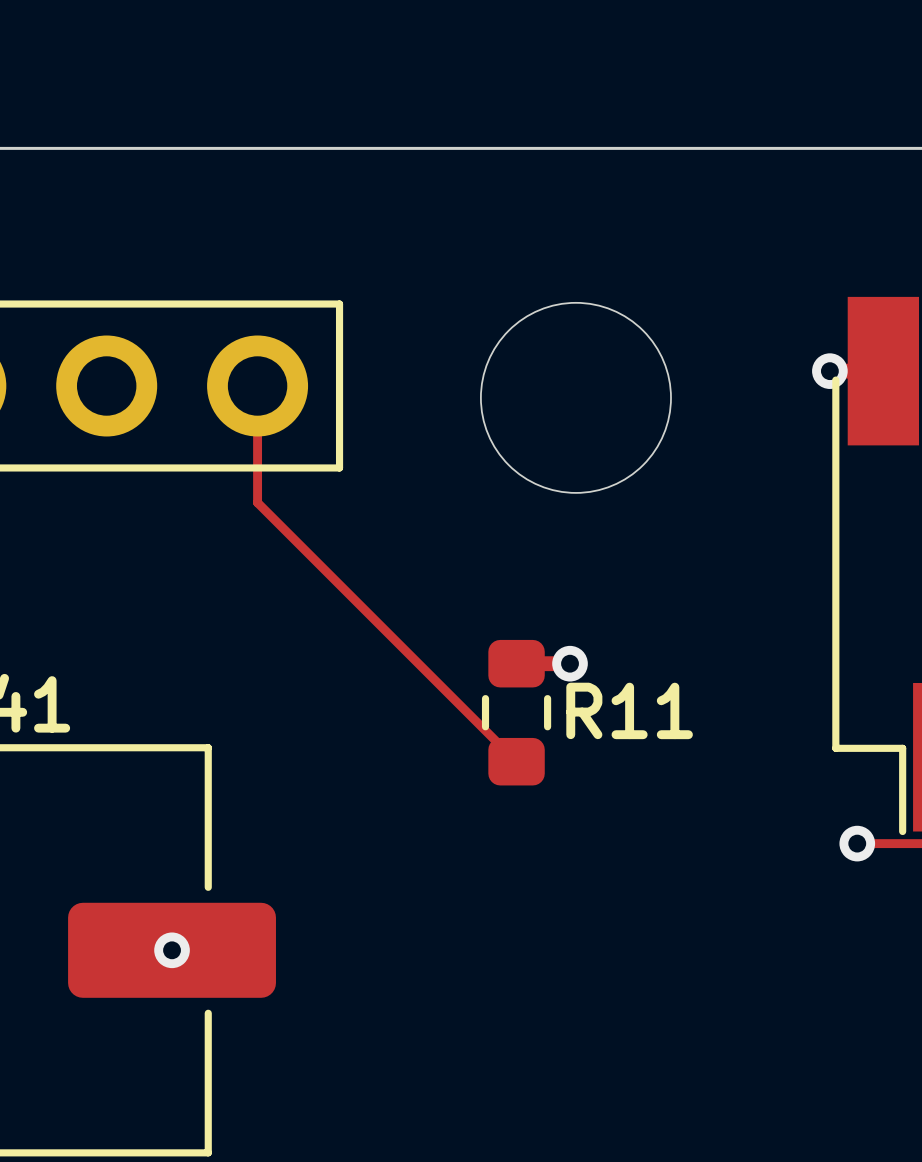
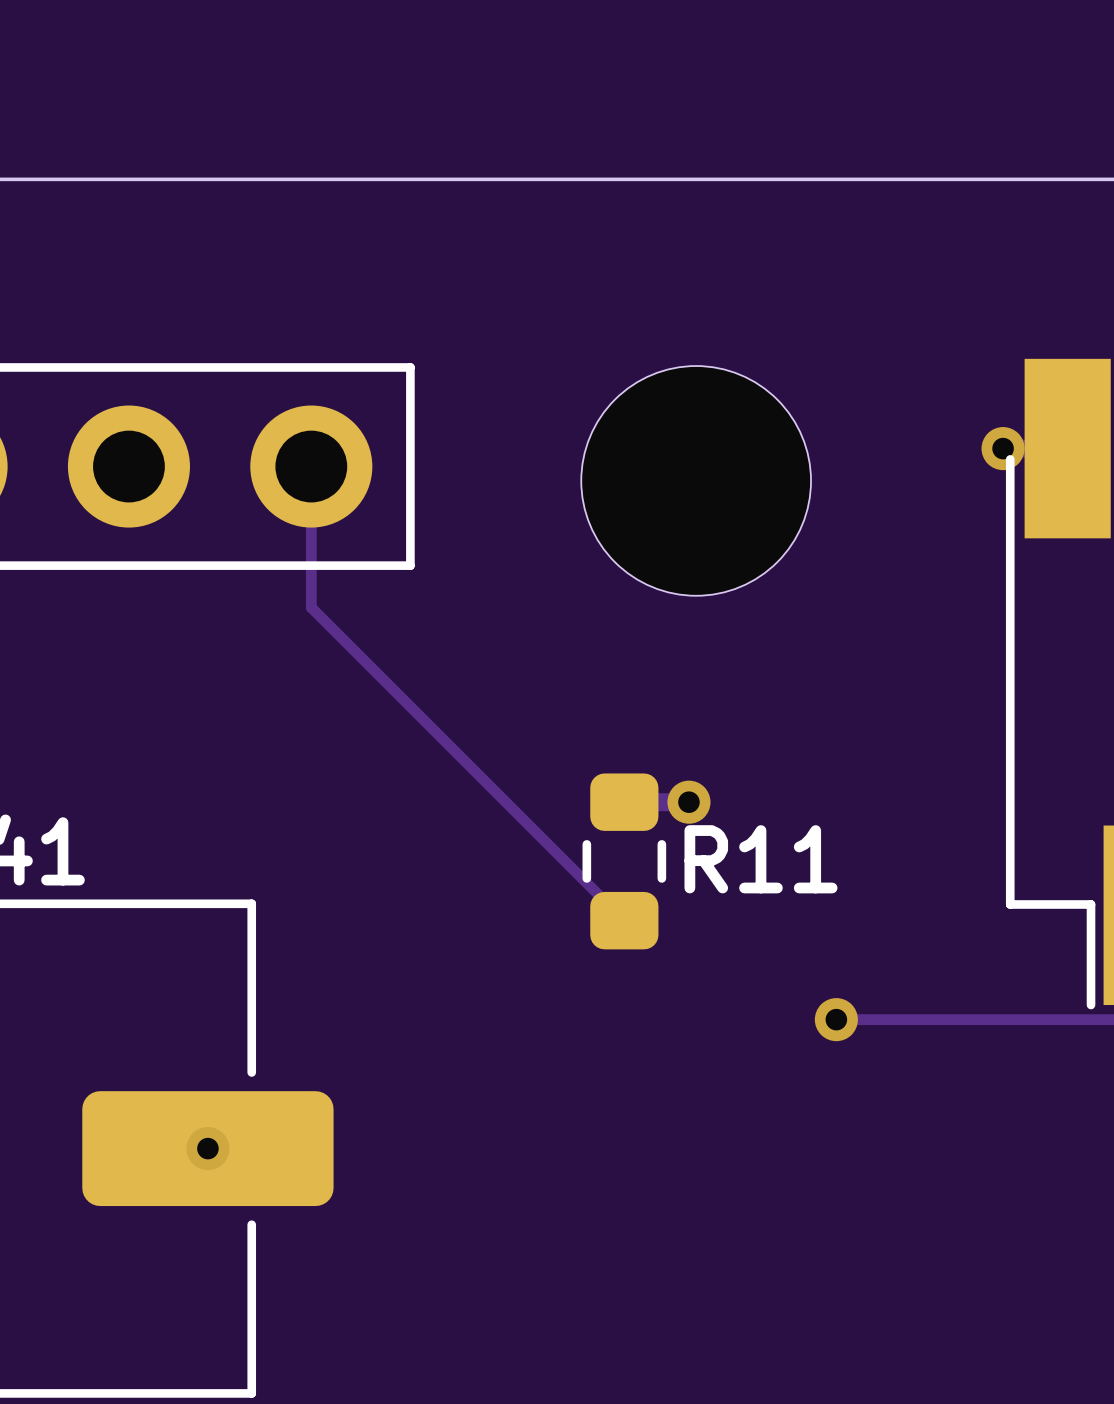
track: none -> (836, 1019) (1036, 1019)
via position: (857, 843) -> (836, 1019)

